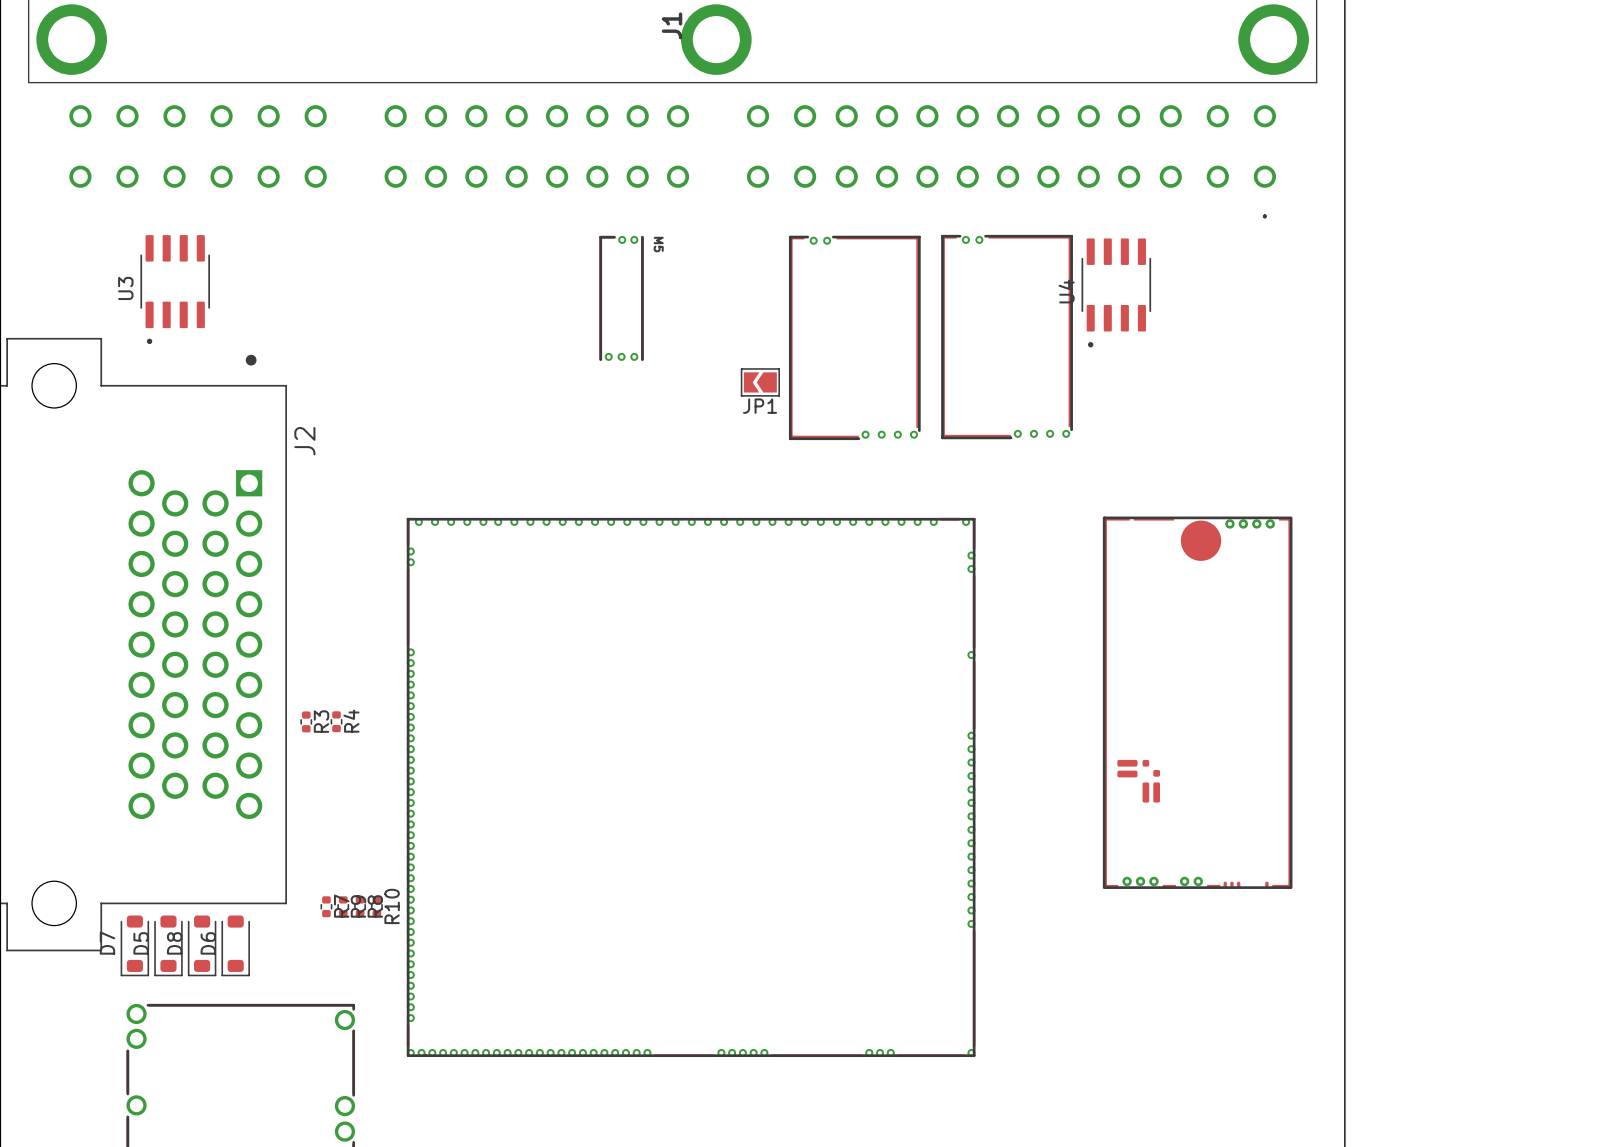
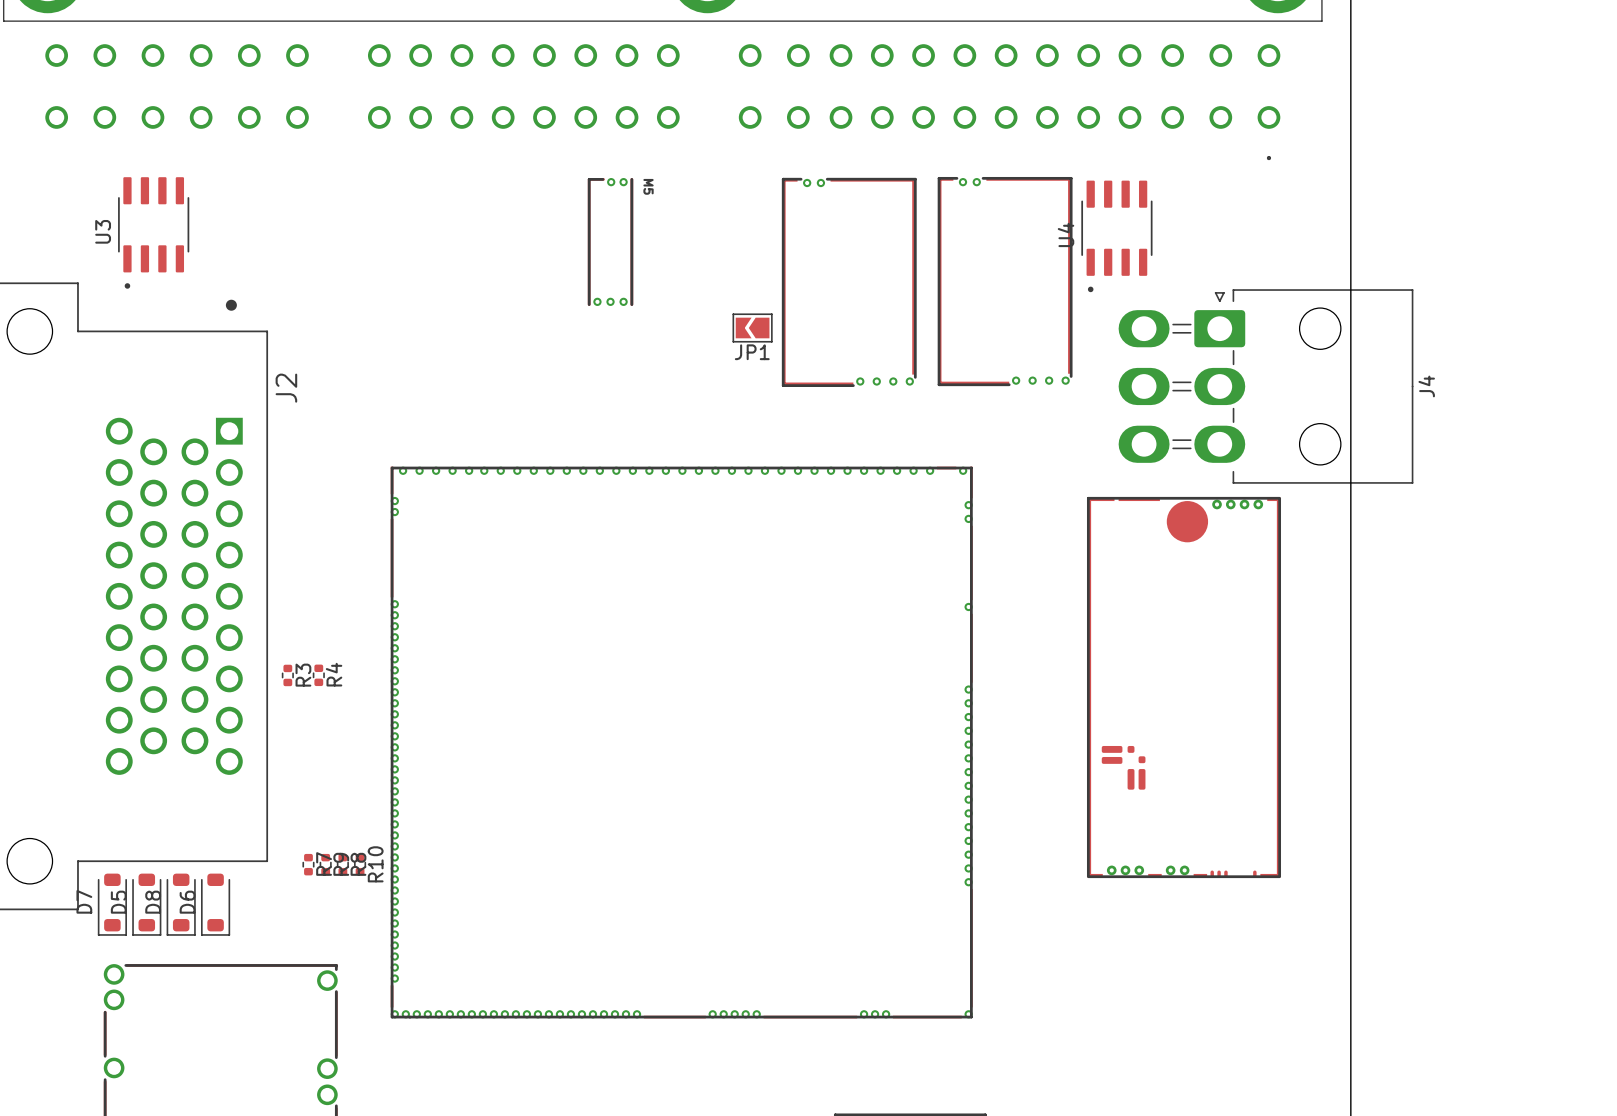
J4: none -> (1266, 386)
part position: (1197, 702) -> (1183, 687)

